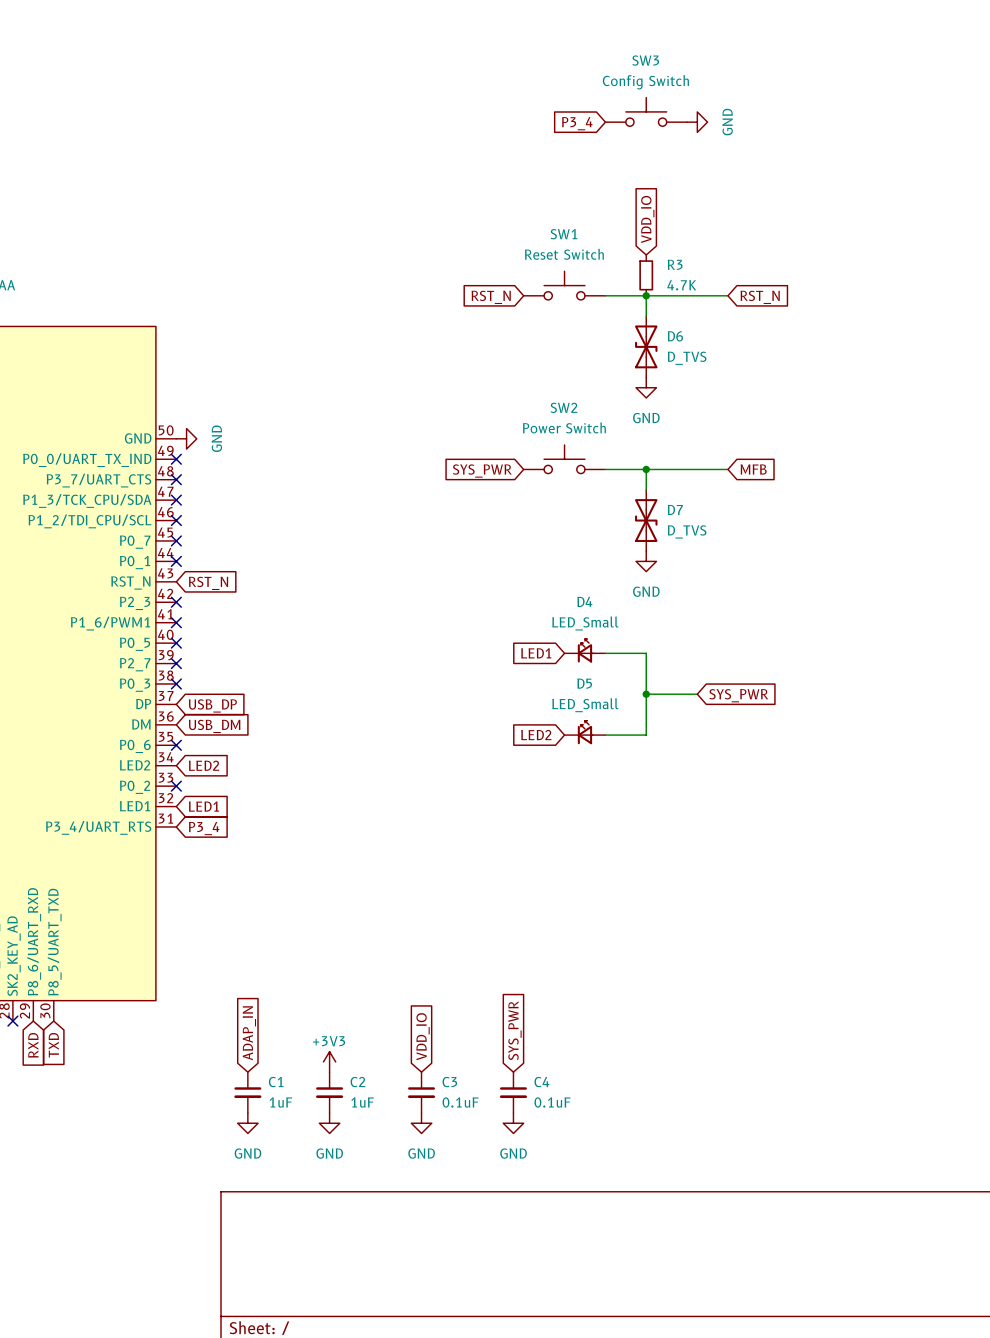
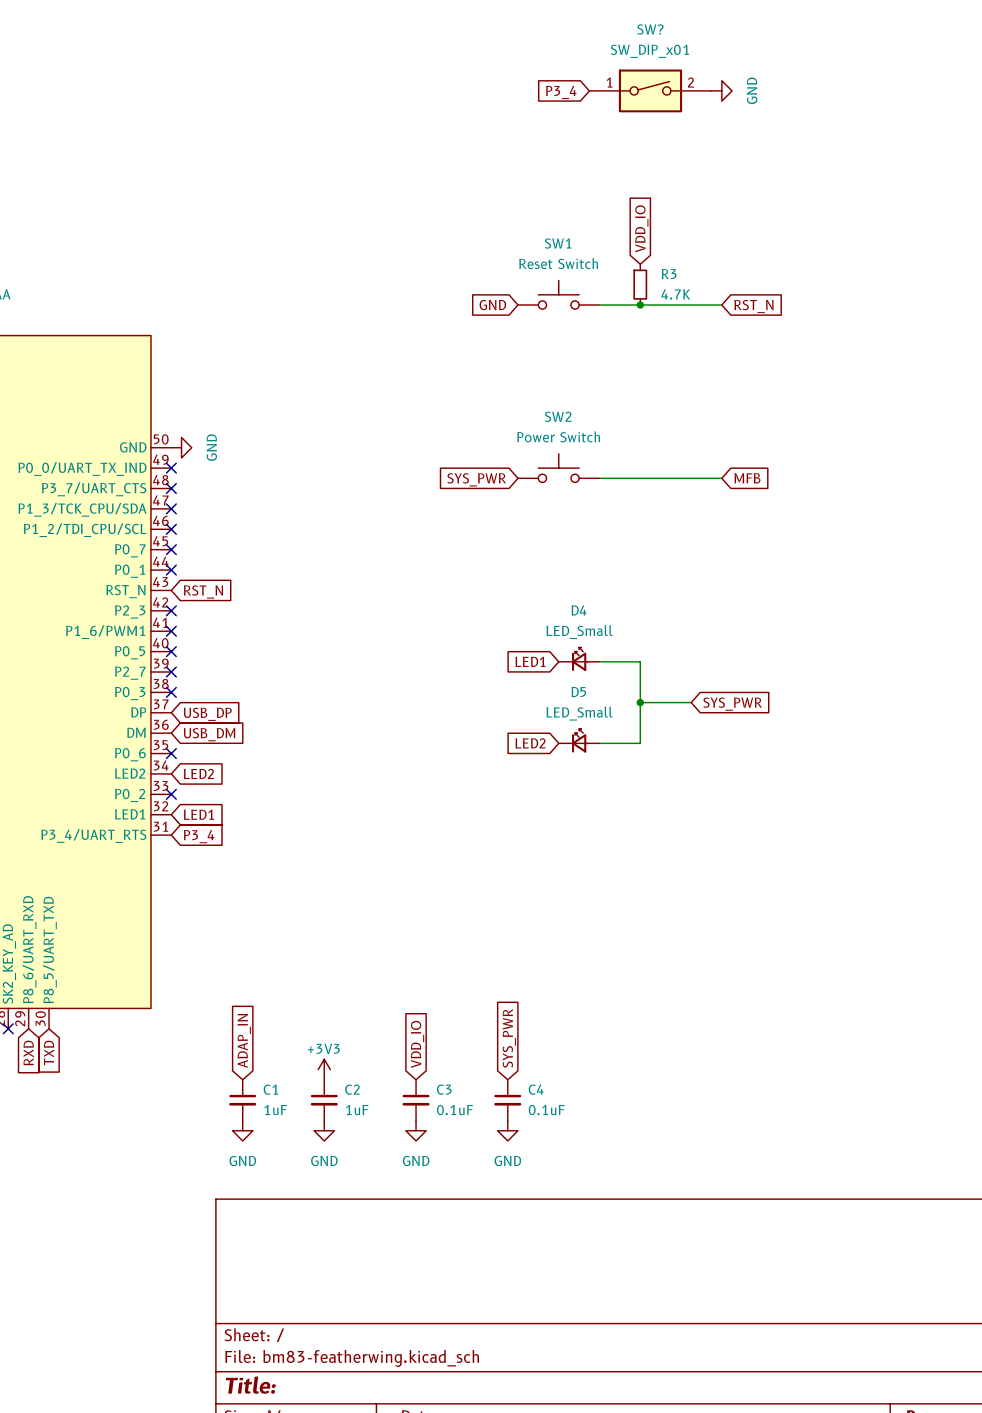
SW?: none -> SW_DIP_x01 (650, 90)
SW3: Config Switch (646, 111) -> none
power symbol position: GND (697, 122) -> GND (721, 90)
global label position: P3_4 (577, 123) -> P3_4 (561, 92)
wire: (646, 295) (646, 316) -> none
global label: RST_N (491, 297) -> GND (492, 305)
D6: D_TVS (646, 346) -> none
power symbol: GND (646, 387) -> none
wire: (646, 469) (646, 489) -> none
junction: (646, 469) -> none
D7: D_TVS (646, 520) -> none
power symbol: GND (646, 561) -> none

